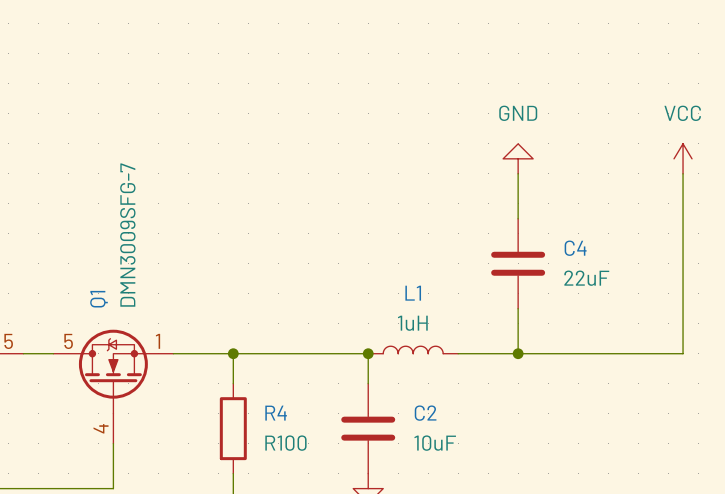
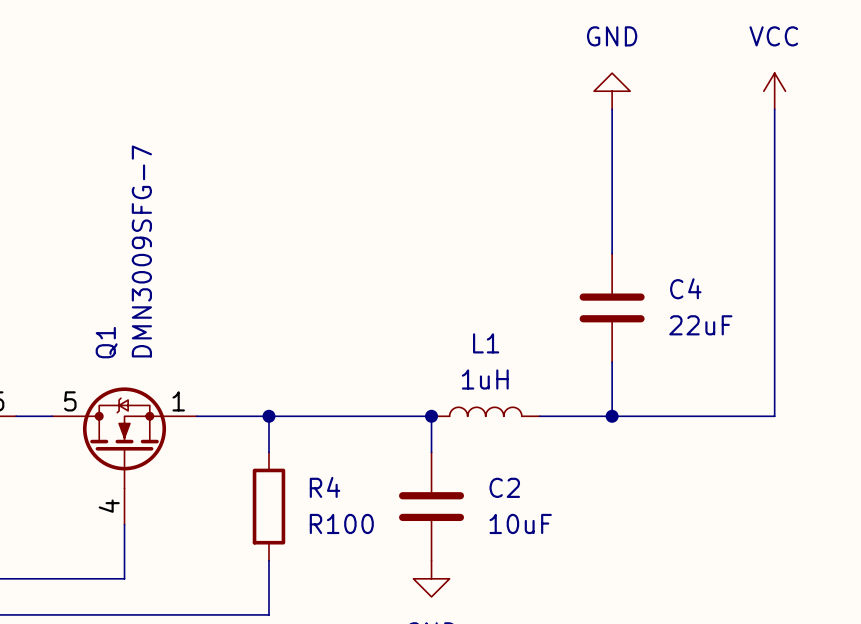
wire: none -> (612, 109) (612, 199)
power symbol position: GND (518, 158) -> GND (612, 91)
power symbol position: VCC (683, 158) -> VCC (774, 91)
wire: (683, 173) (683, 353) (653, 353) -> (774, 109) (774, 416)

